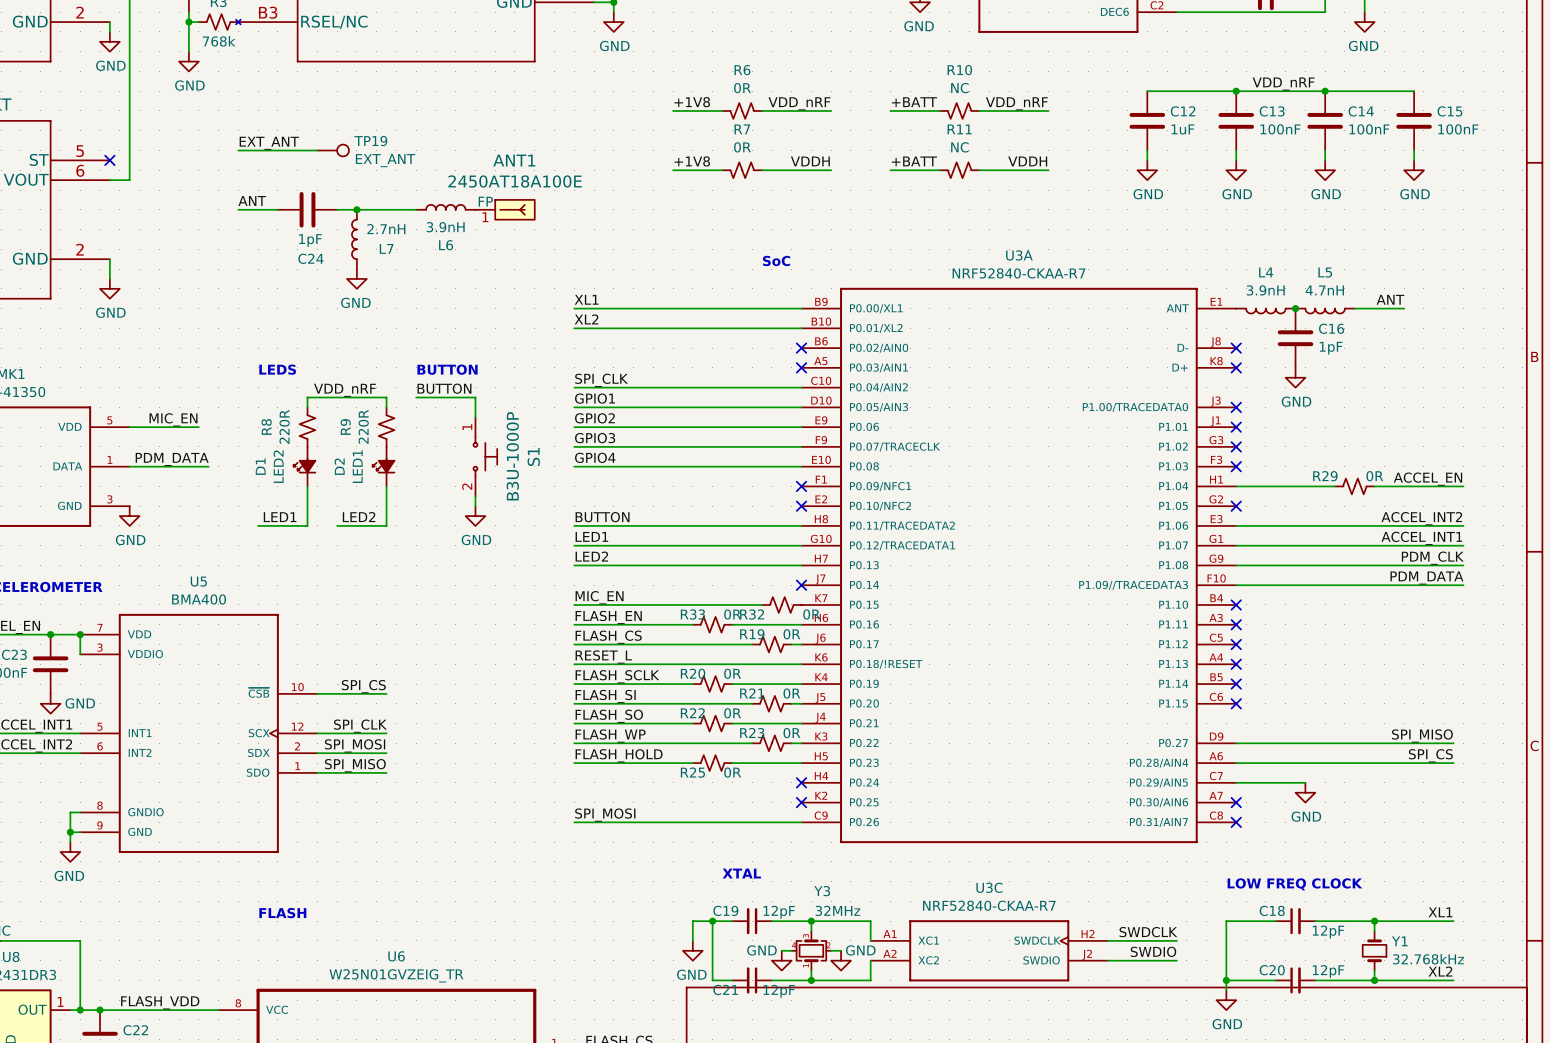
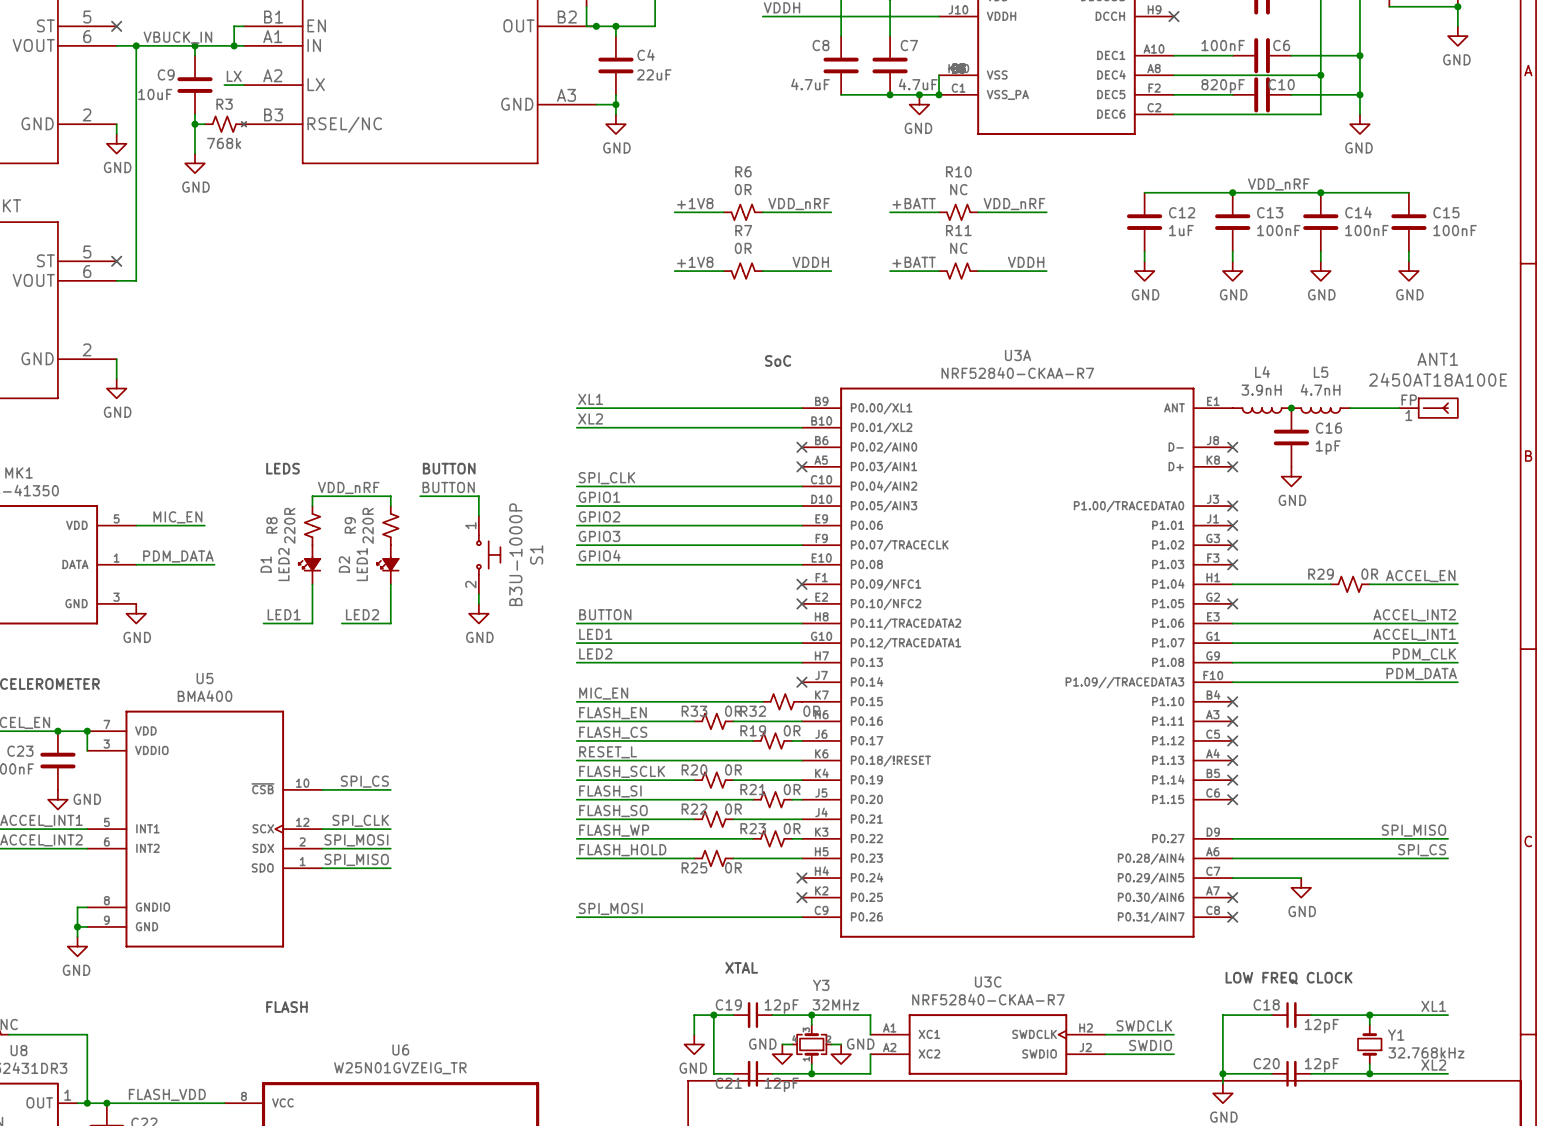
label: EXT_ANT (269, 143) -> none
wire: (238, 150) (317, 150) -> none
TP19: EXT_ANT (333, 150) -> none
label: ANT (252, 200) -> none
L6: 3.9nH (445, 207) -> none
wire: (238, 209) (277, 209) -> none
C24: 1pF (307, 209) -> none
wire: (337, 209) (416, 209) -> none
junction: (356, 209) -> none
ANT1 position: (505, 209) -> (1428, 408)
L7: 2.7nH (354, 239) -> none
power symbol: GND (356, 278) -> none
label: ANT (1390, 299) -> none

